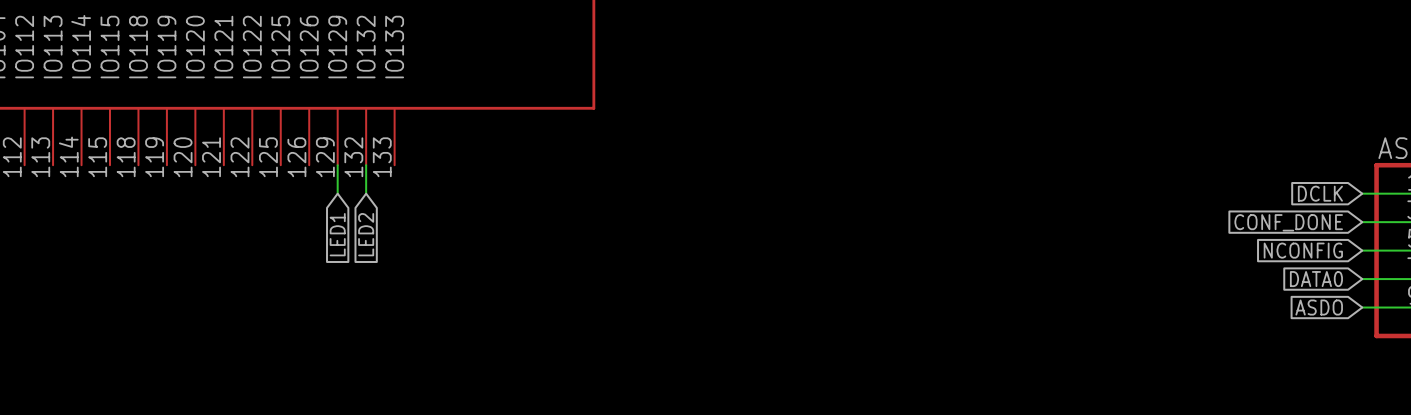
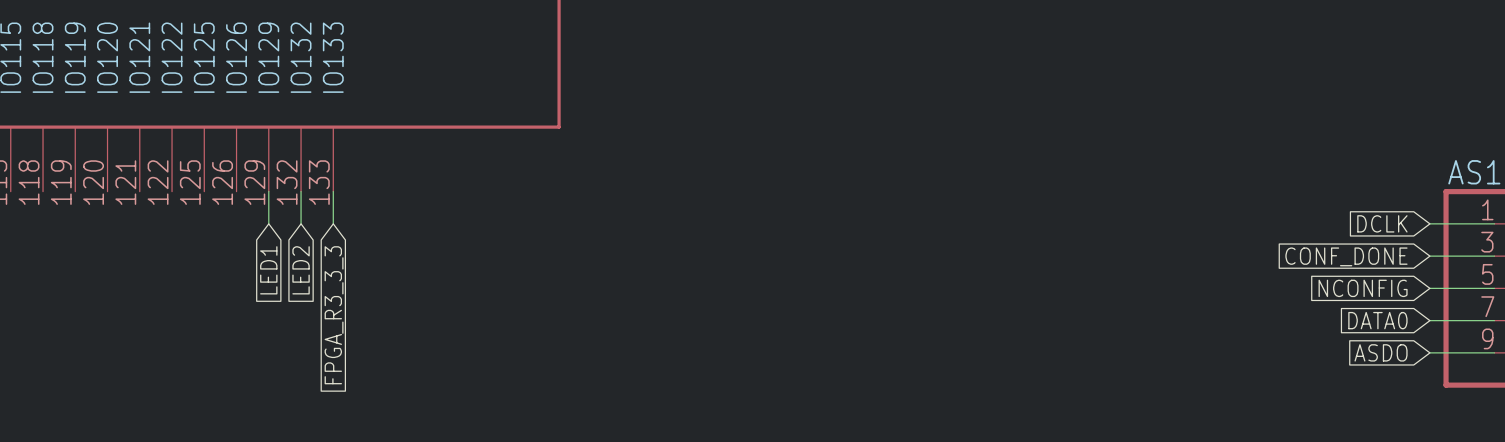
wire: none -> (333, 191) (333, 223)
global label: none -> FPGA_R3_3_3 (334, 315)

